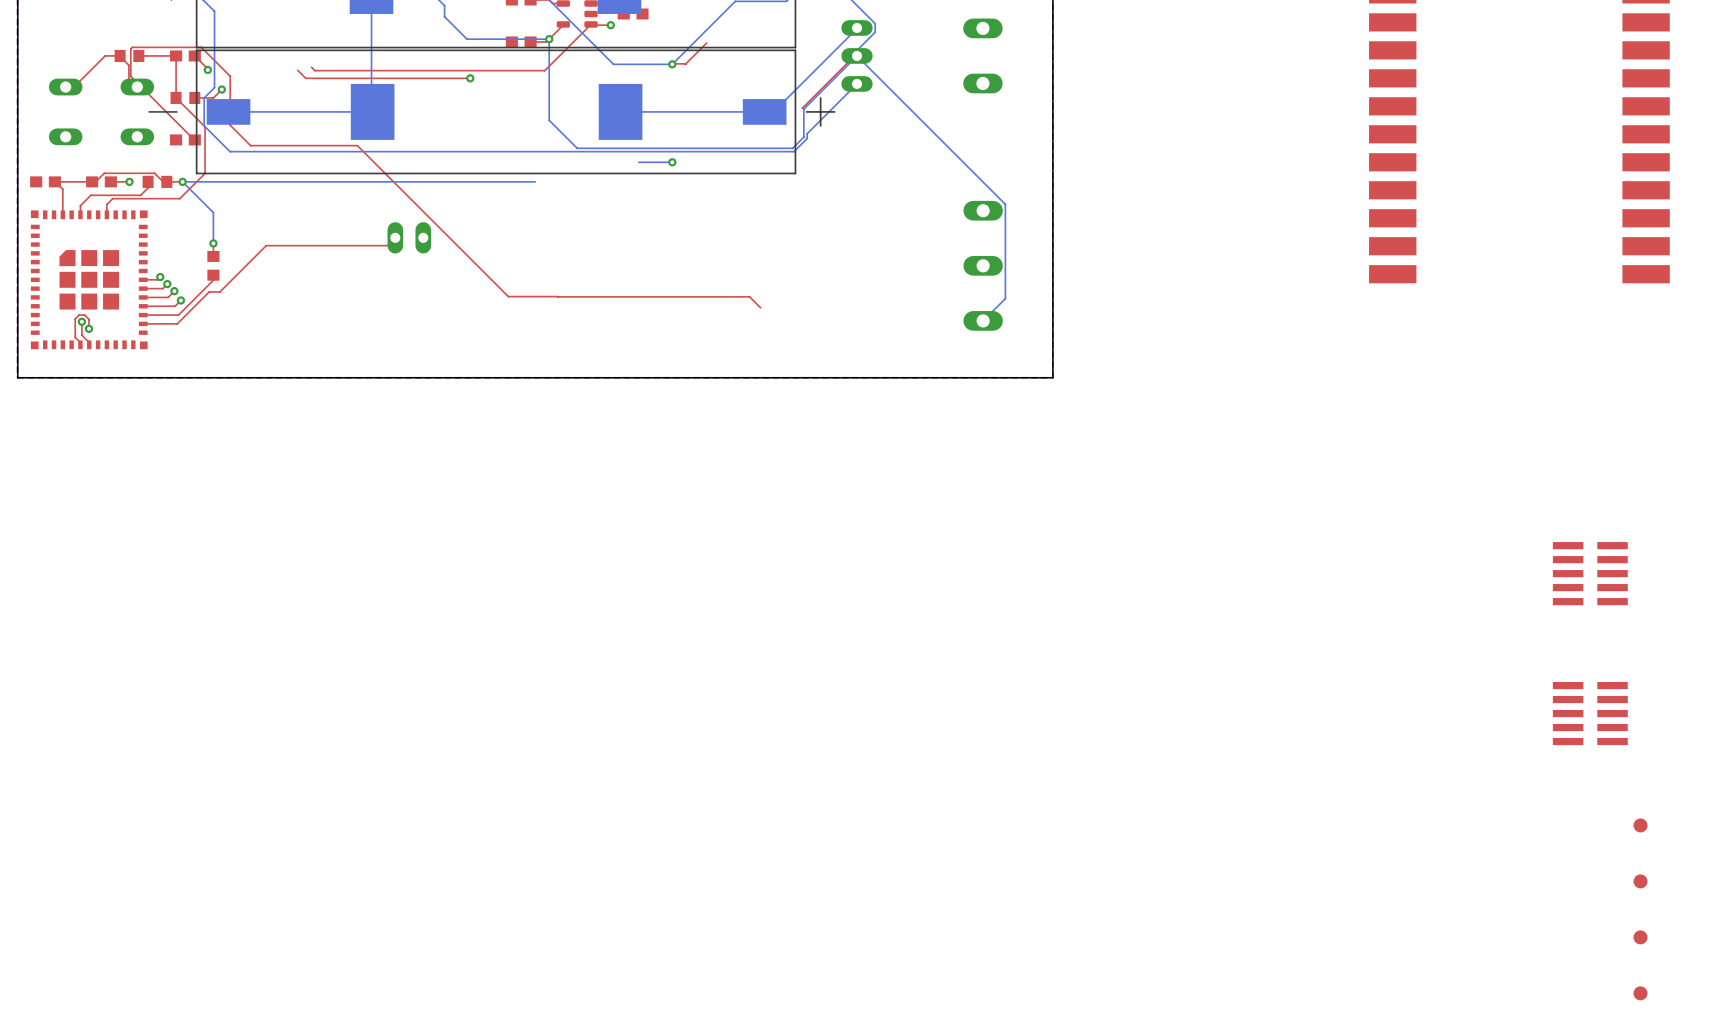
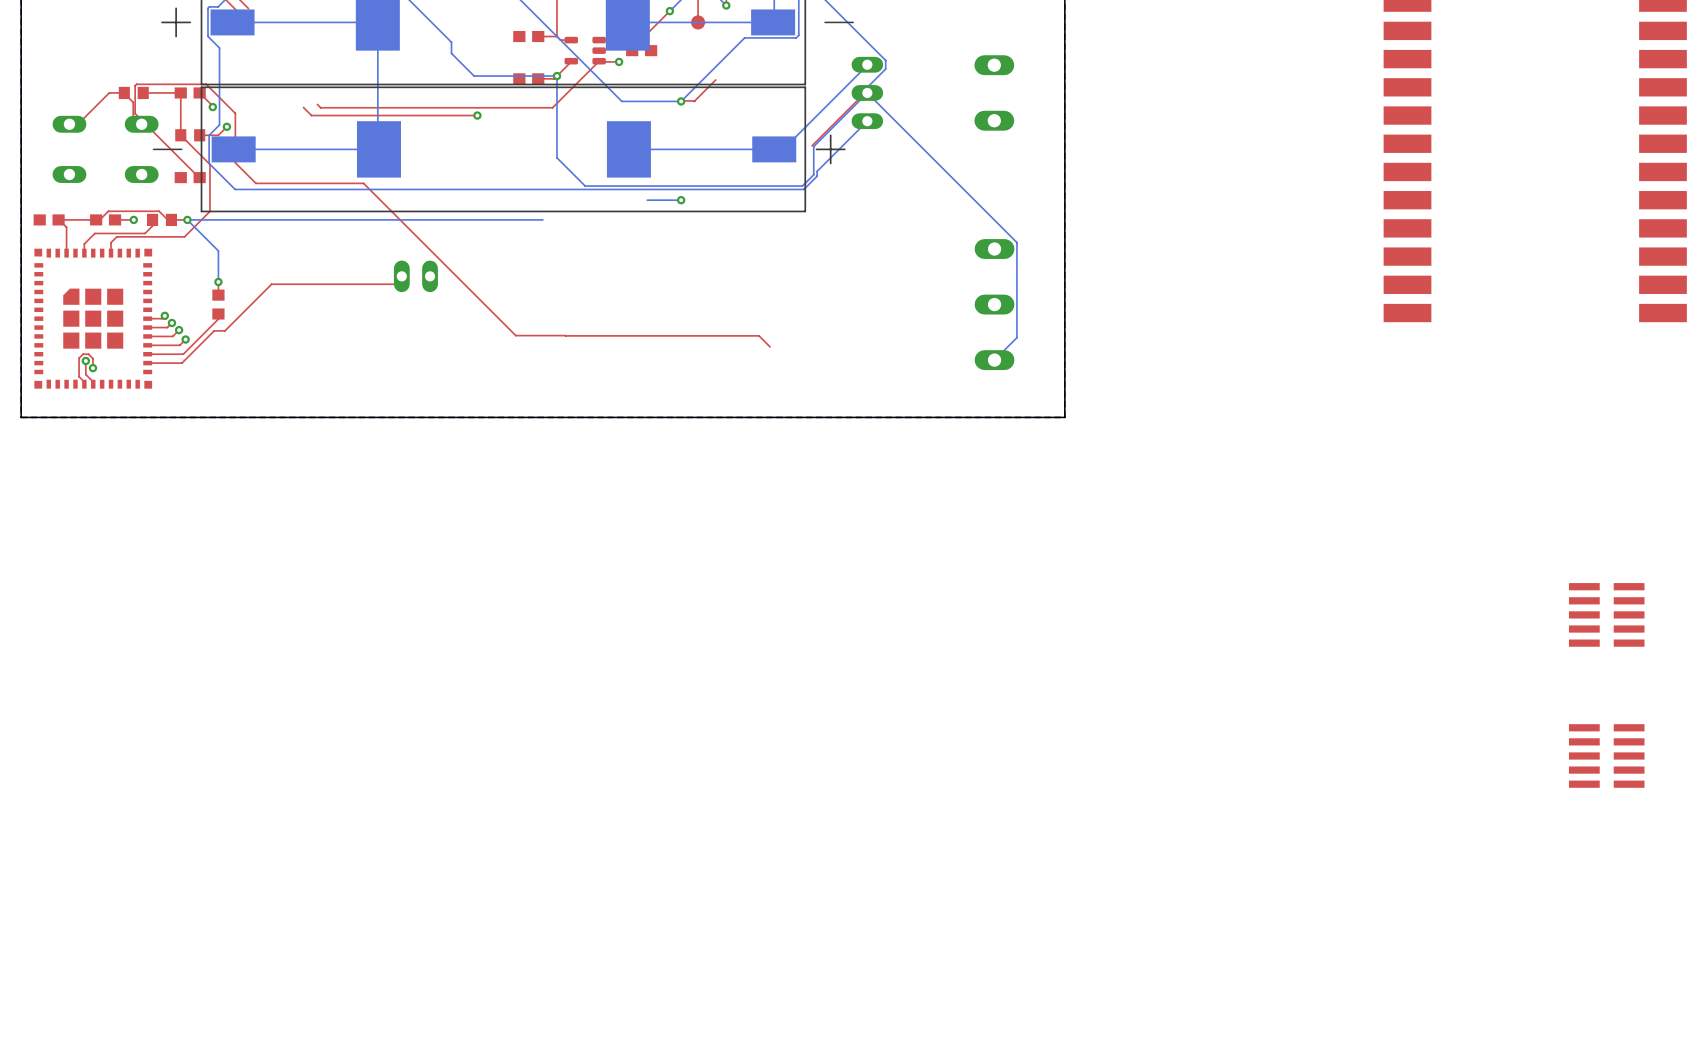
part: (1640, 825) -> none
part: (1640, 881) -> none
part: (1640, 937) -> none
part: (1640, 993) -> none

